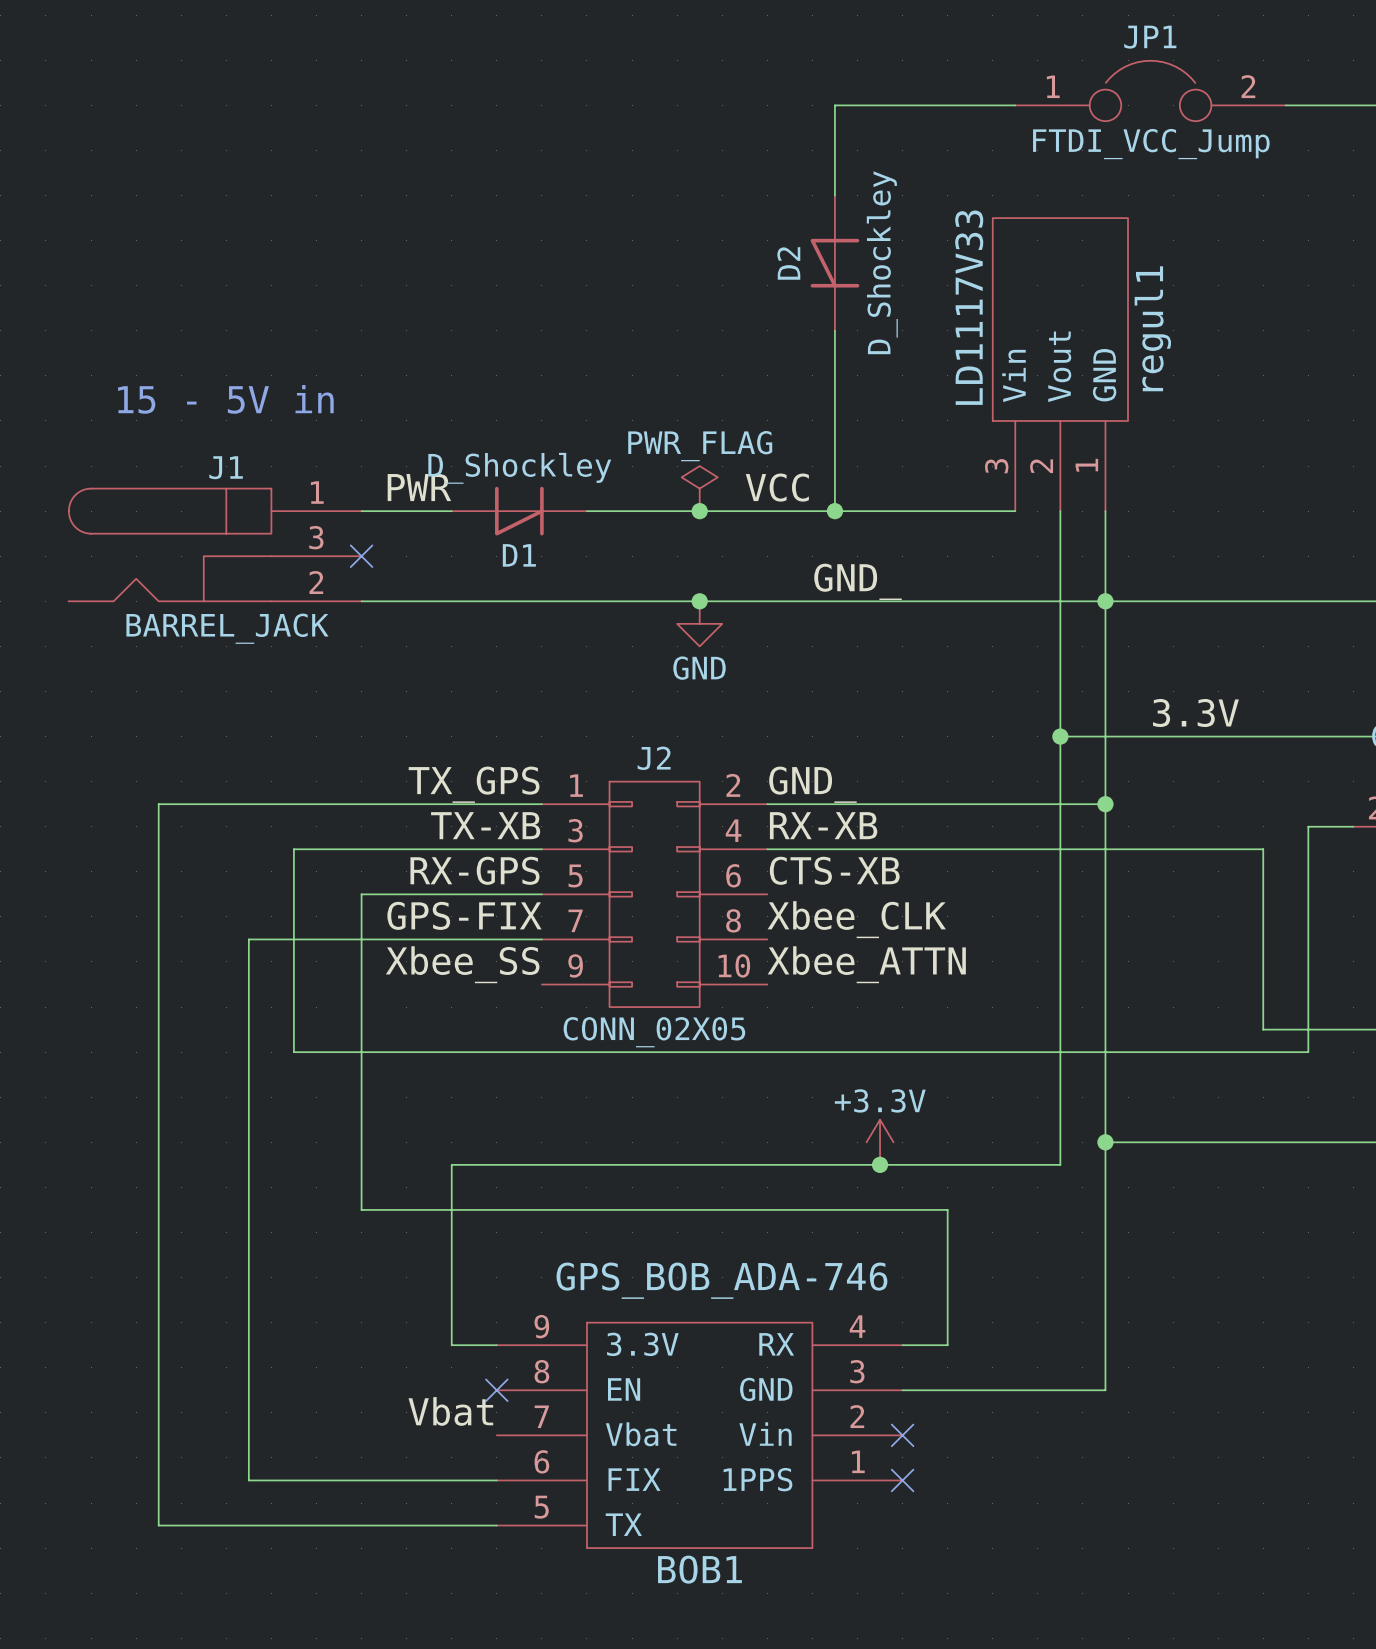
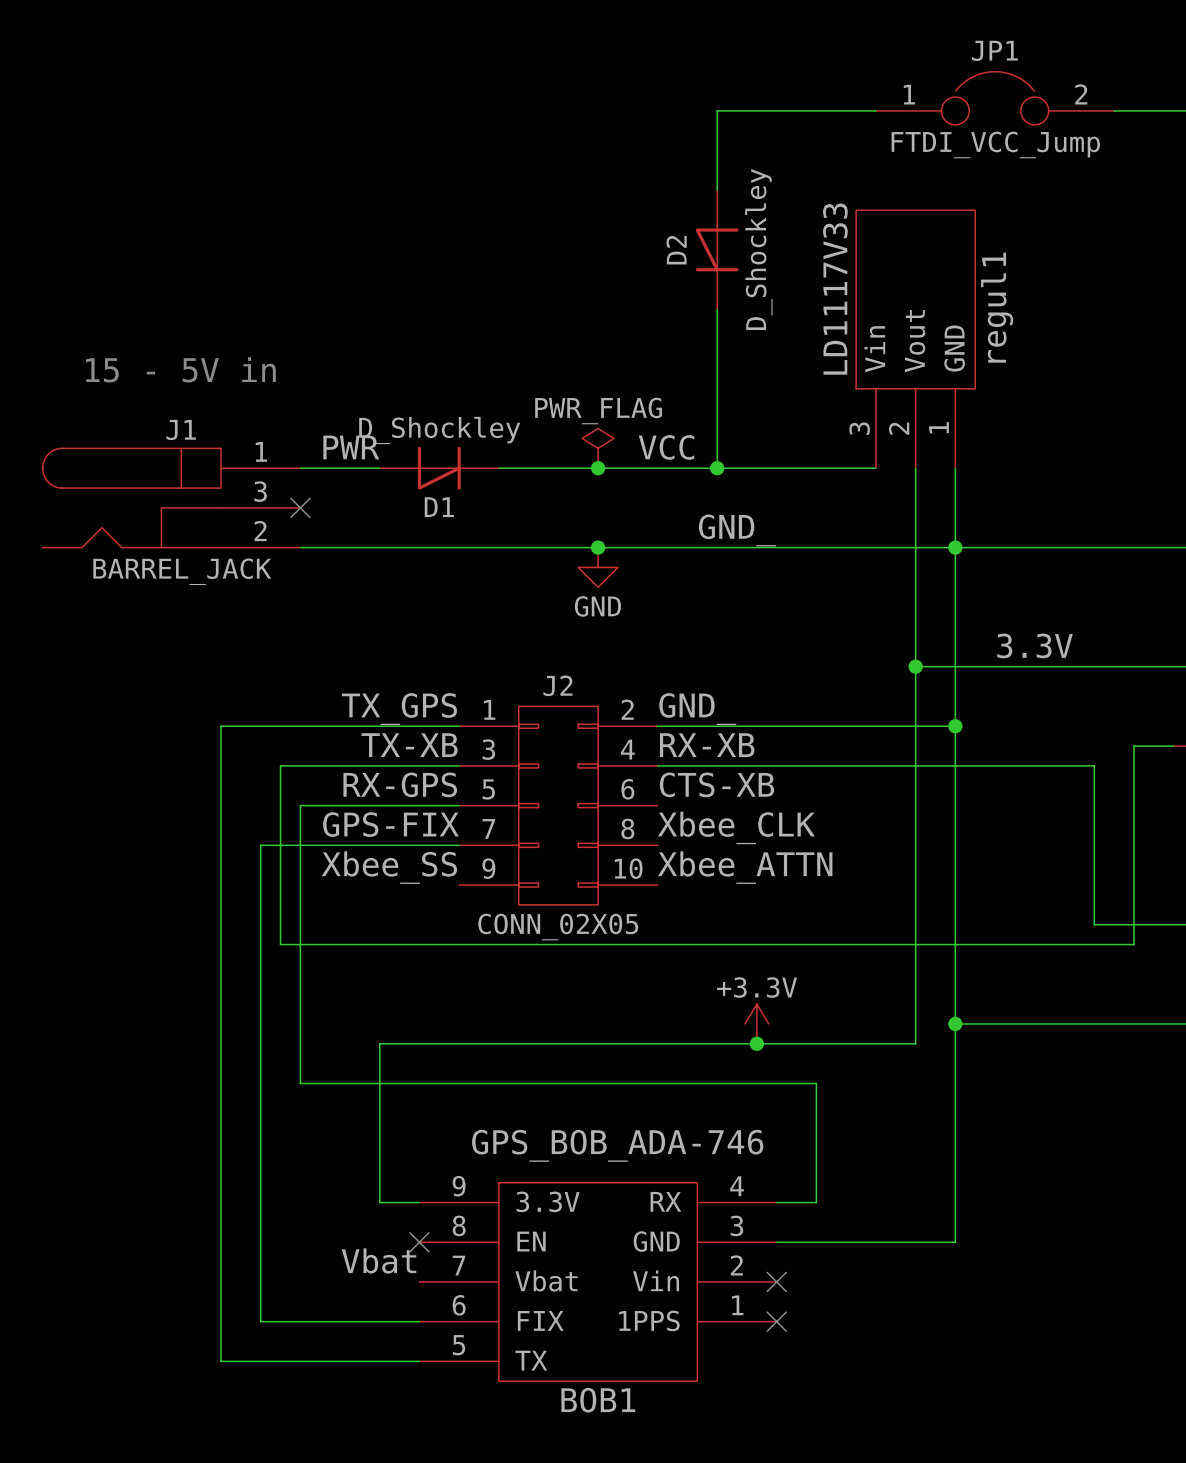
wire: (271, 804) (158, 804) (158, 1525) (271, 1525) -> (220, 726) (220, 1361)
wire: (339, 849) (293, 849) (293, 1052) (339, 1052) -> (280, 765) (280, 944)
wire: (316, 939) (248, 939) (248, 1480) (316, 1480) -> (260, 845) (260, 1321)

